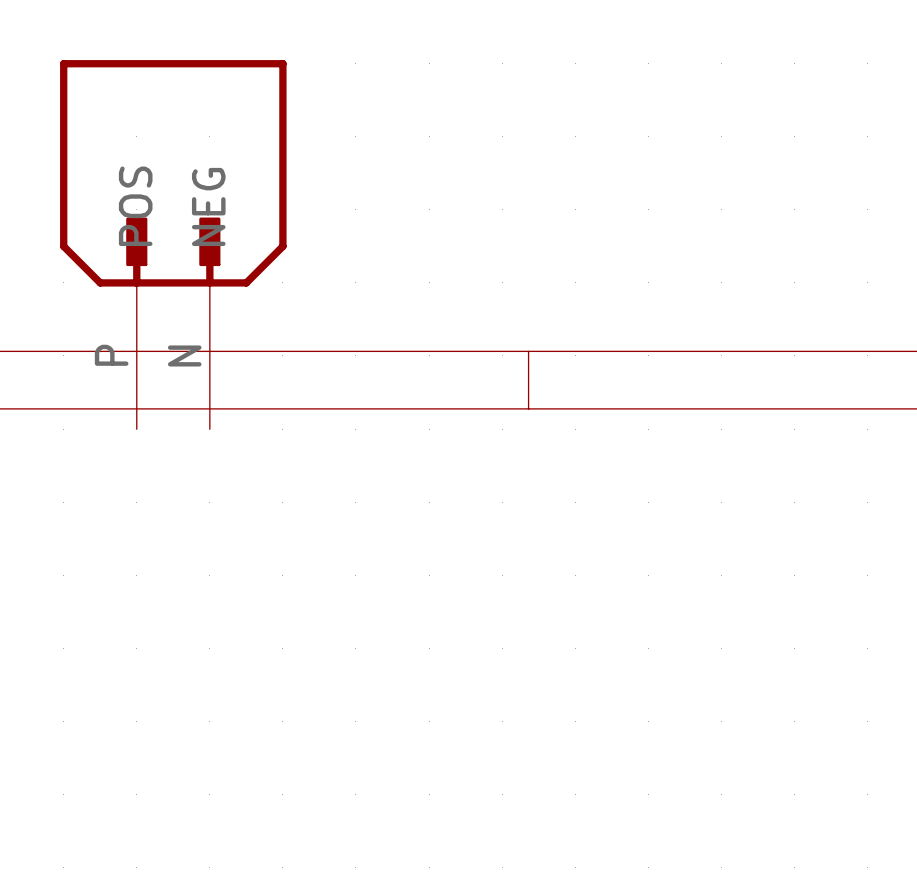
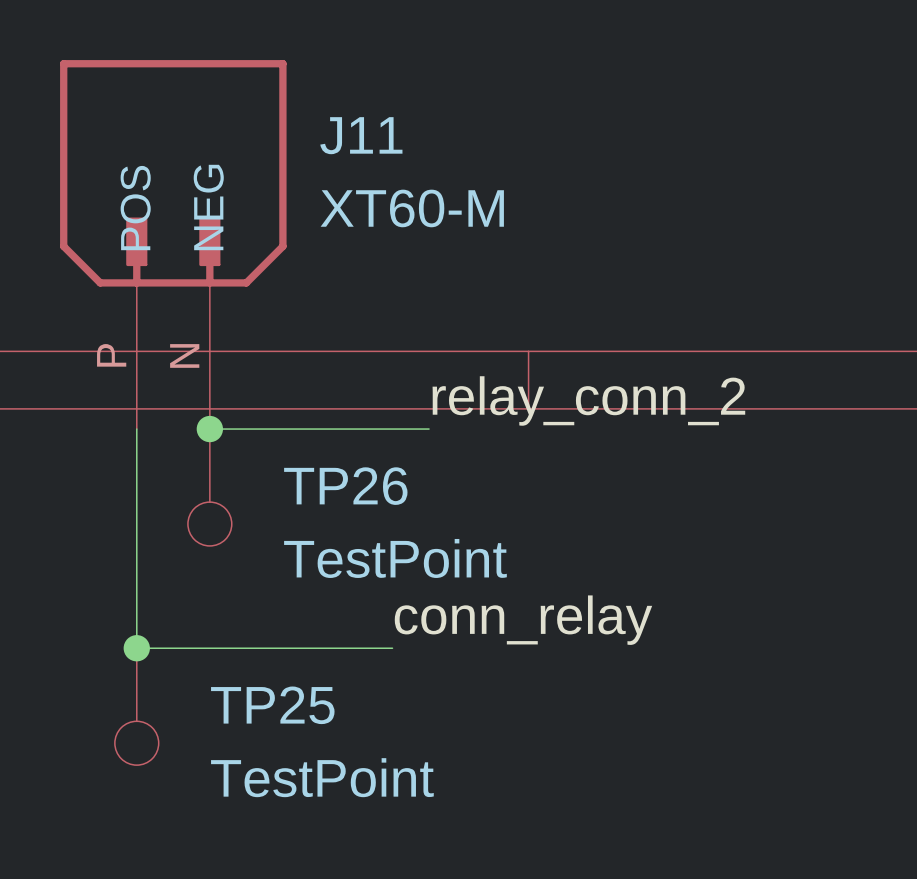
J11 name: none -> J11 (361, 135)
J11 value: none -> XT60-M (412, 208)
label: none -> relay_conn_2 (588, 400)
wire: none -> (136, 429) (136, 648) (392, 648)
wire: none -> (209, 429) (429, 429)
junction: none -> (209, 429)
TP26: none -> TestPoint (209, 487)
label: none -> conn_relay (523, 620)
junction: none -> (136, 648)
TP25: none -> TestPoint (136, 706)

